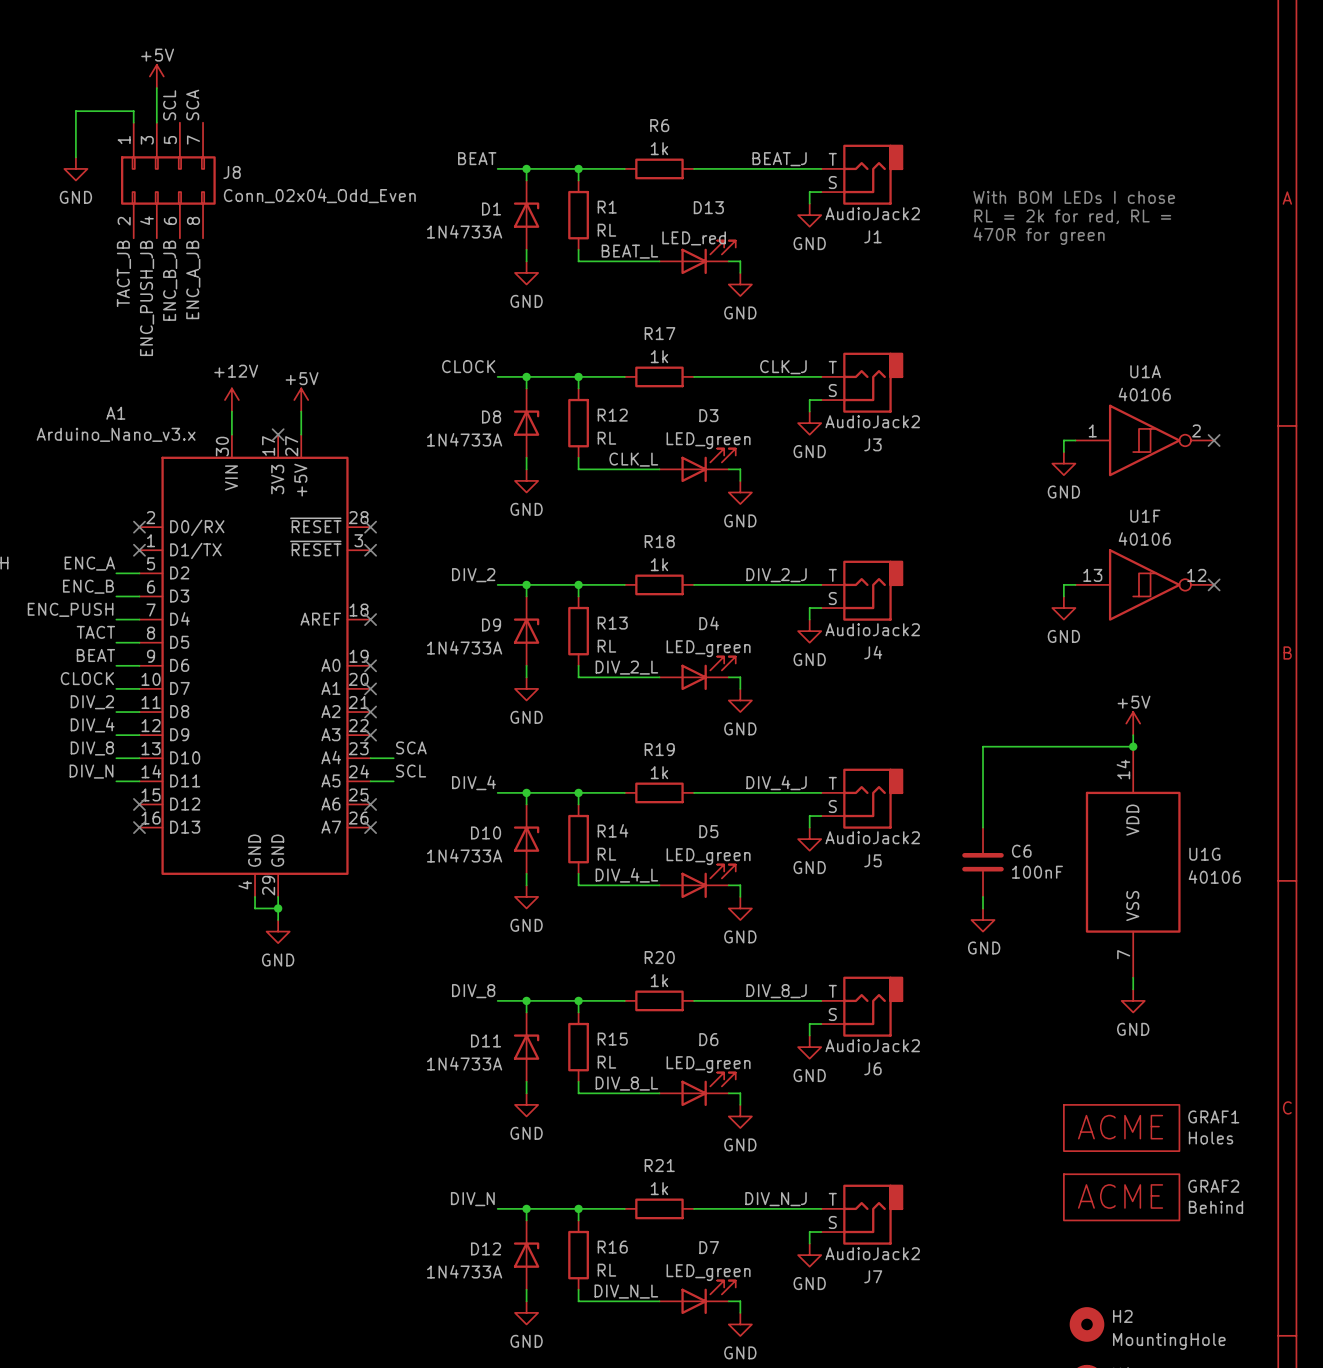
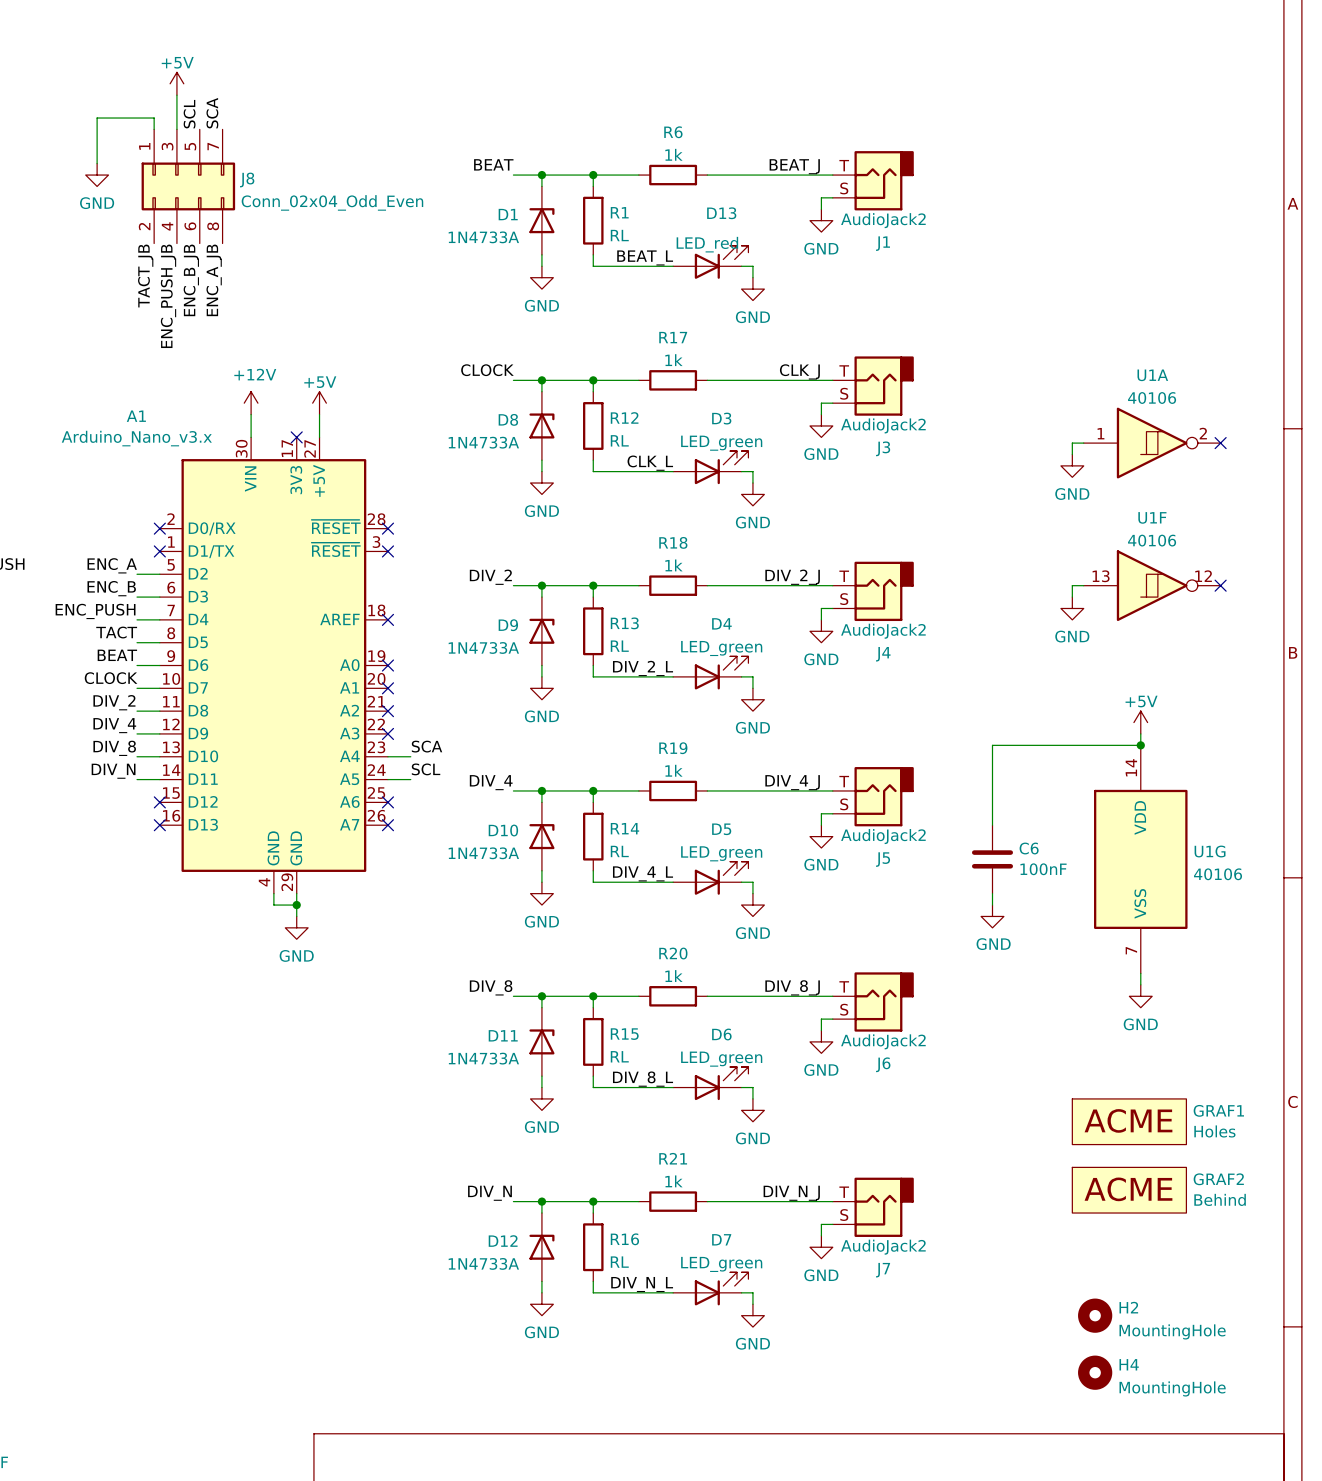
text: With BOM LEDs I chose (1074, 197) -> none
text: RL = 2k for red, RL = (1072, 216) -> none
text: 470R for green (1039, 236) -> none

